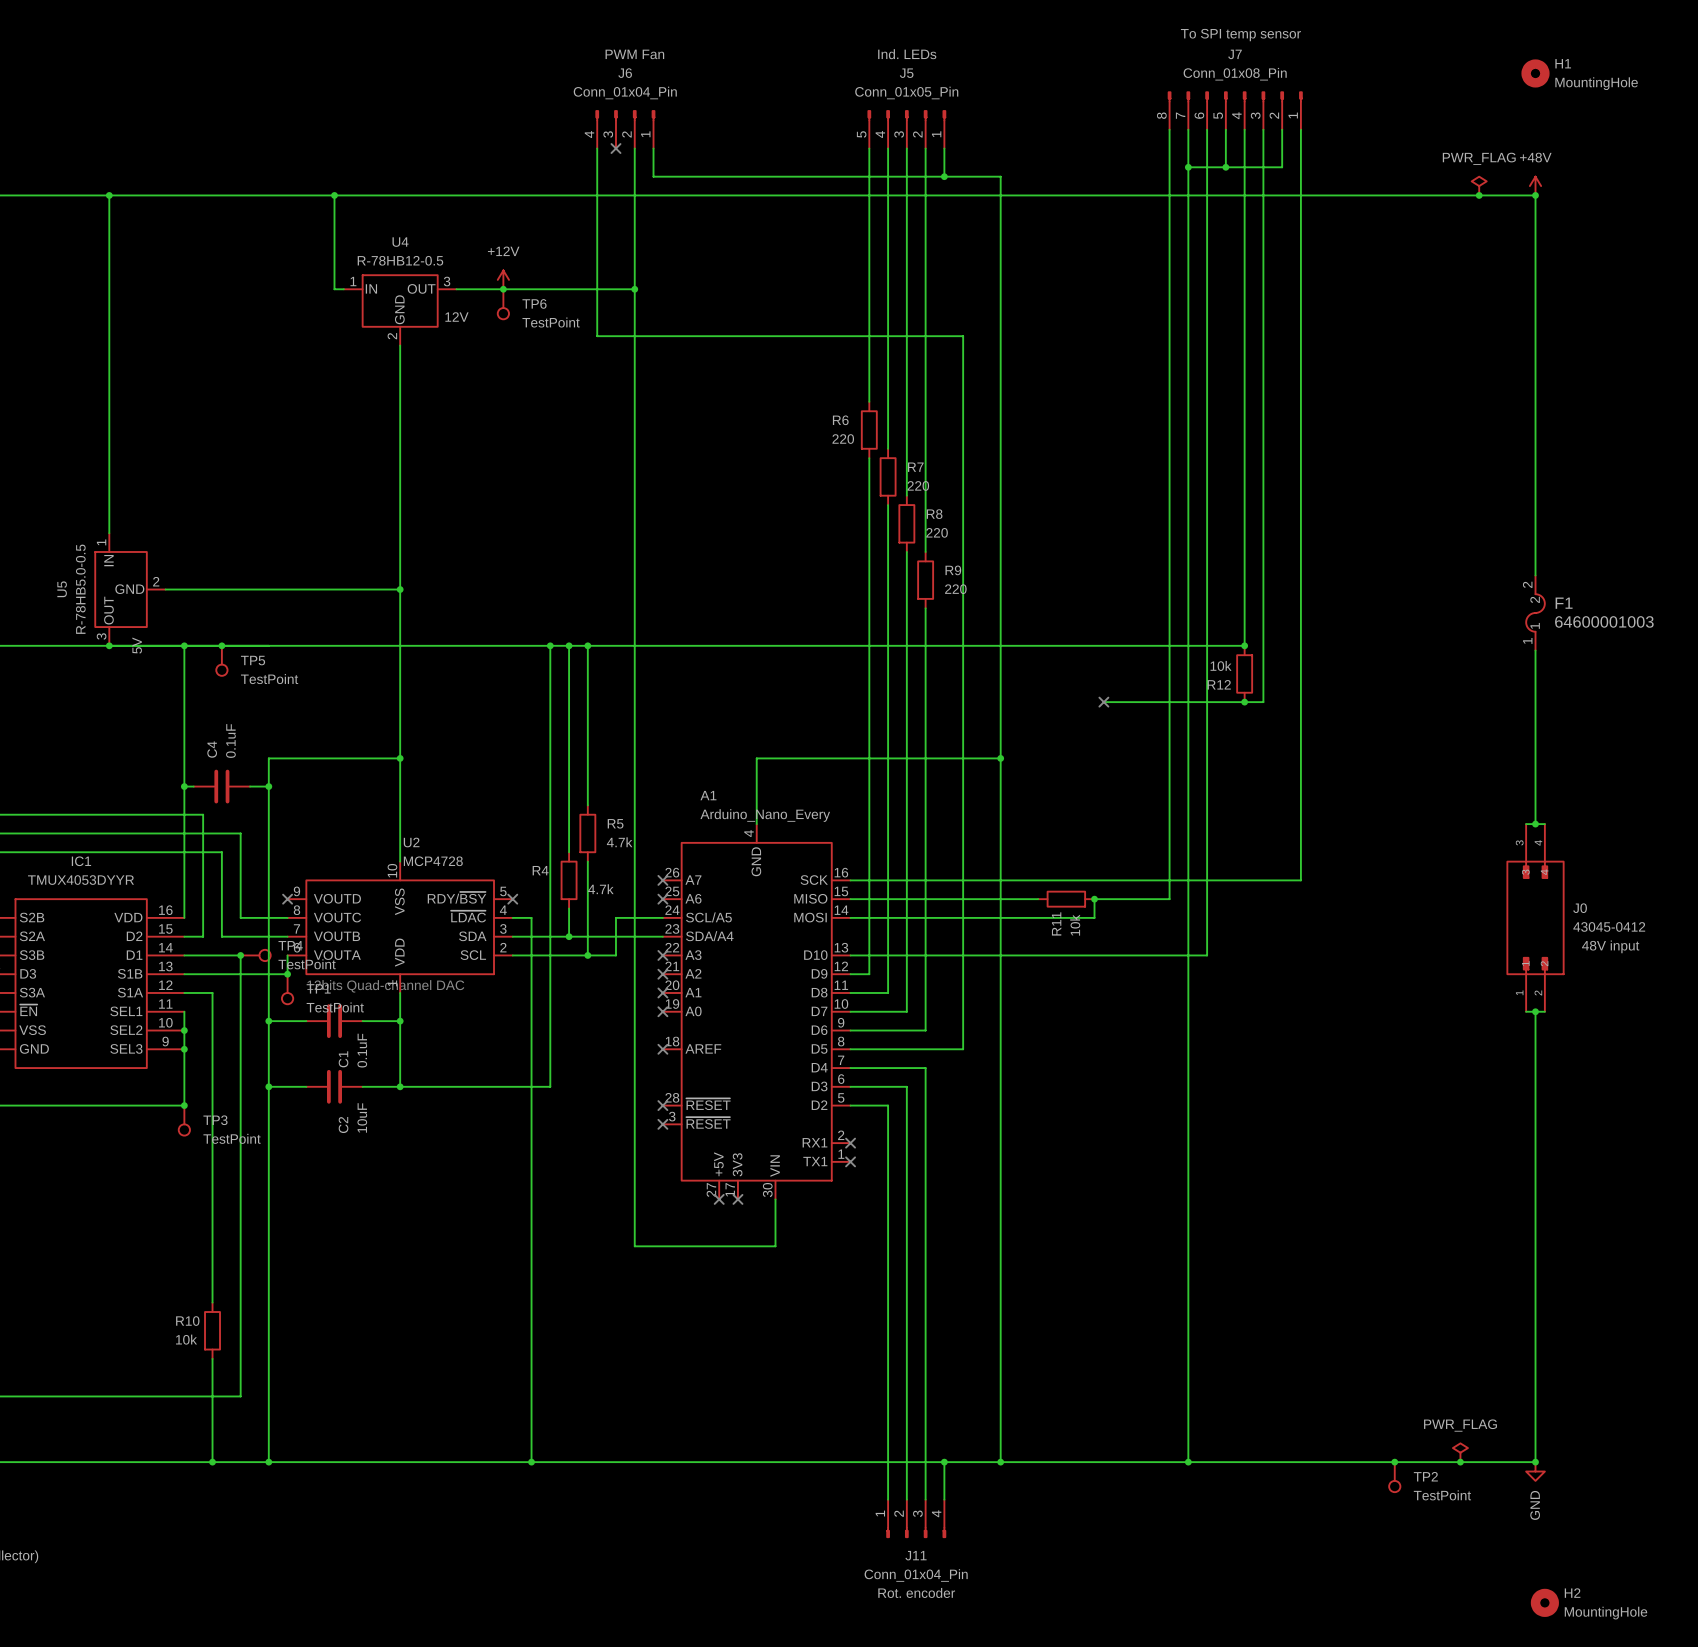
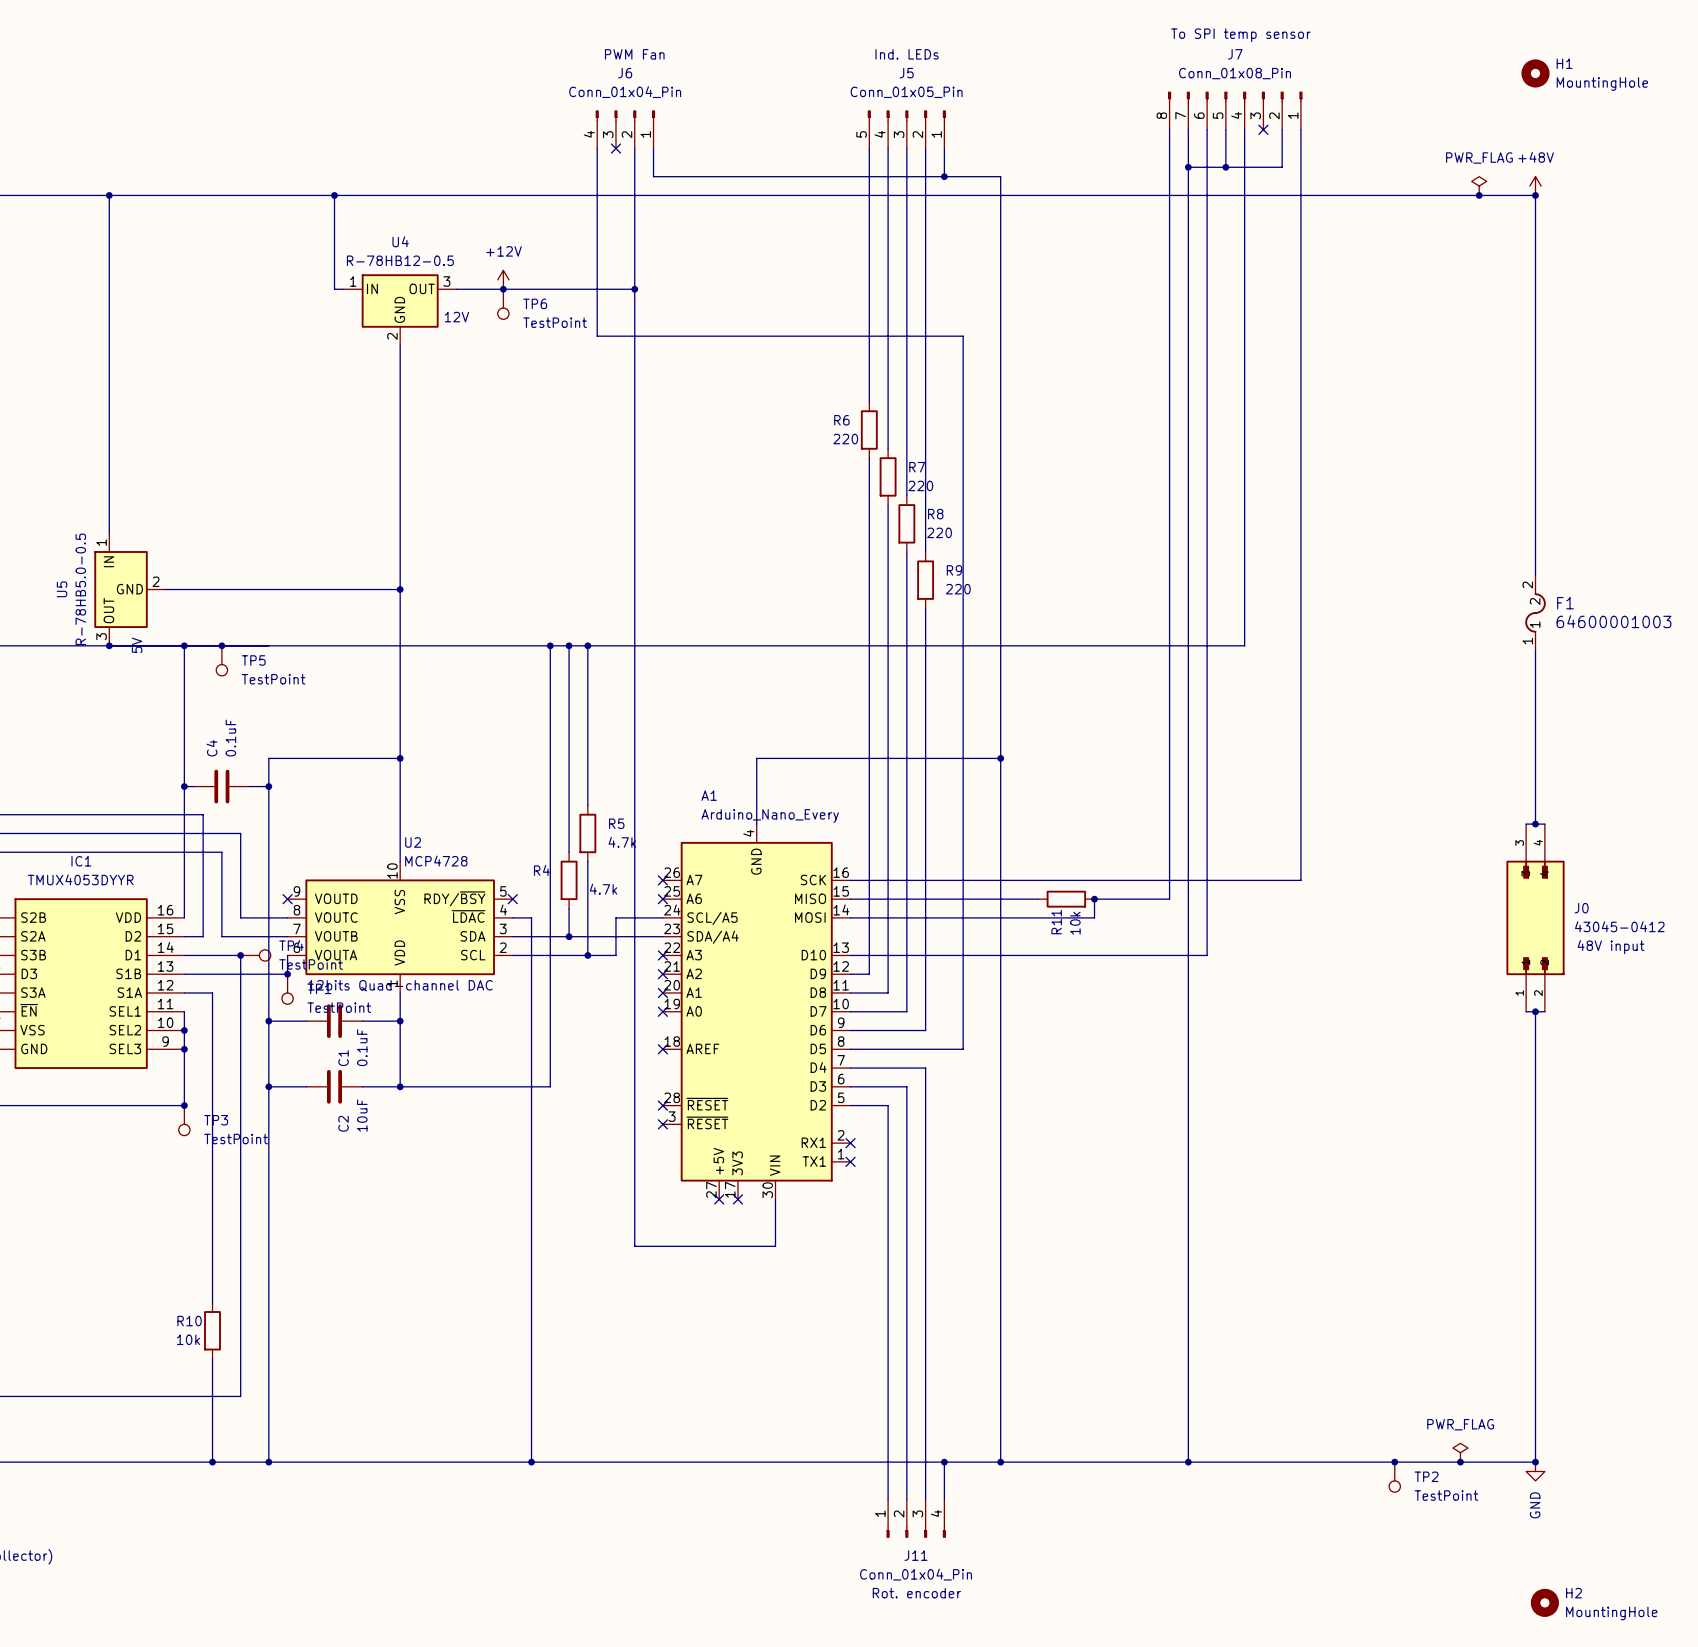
wire: (1263, 129) (1263, 702) (1103, 702) -> none
no-connect mark: none -> (1263, 129)
junction: (1244, 645) -> none
R12: 10k (1244, 673) -> none
no-connect mark: (1103, 702) -> none
junction: (1244, 702) -> none

